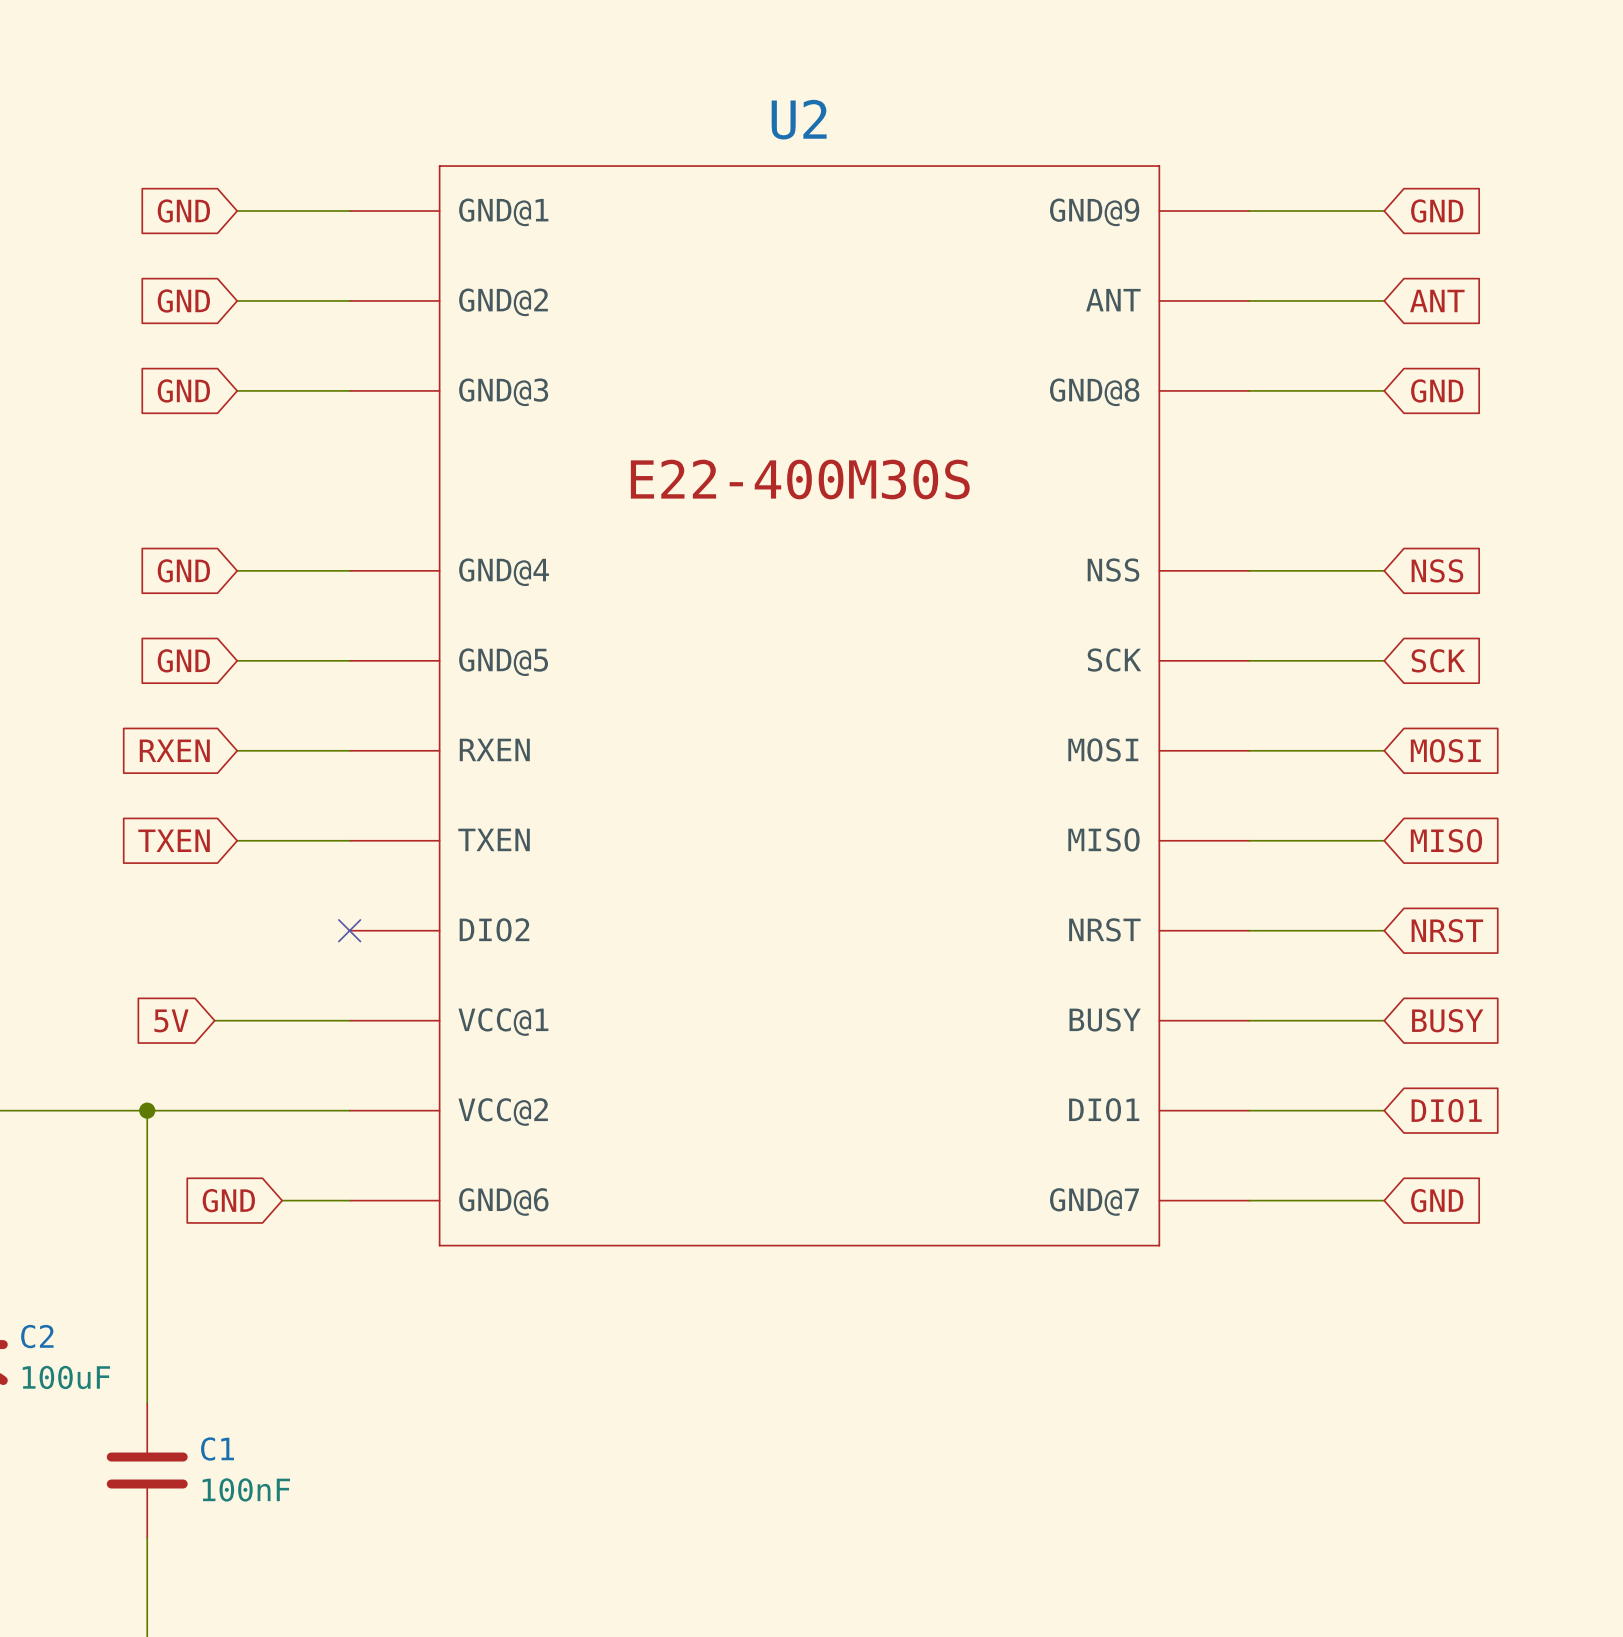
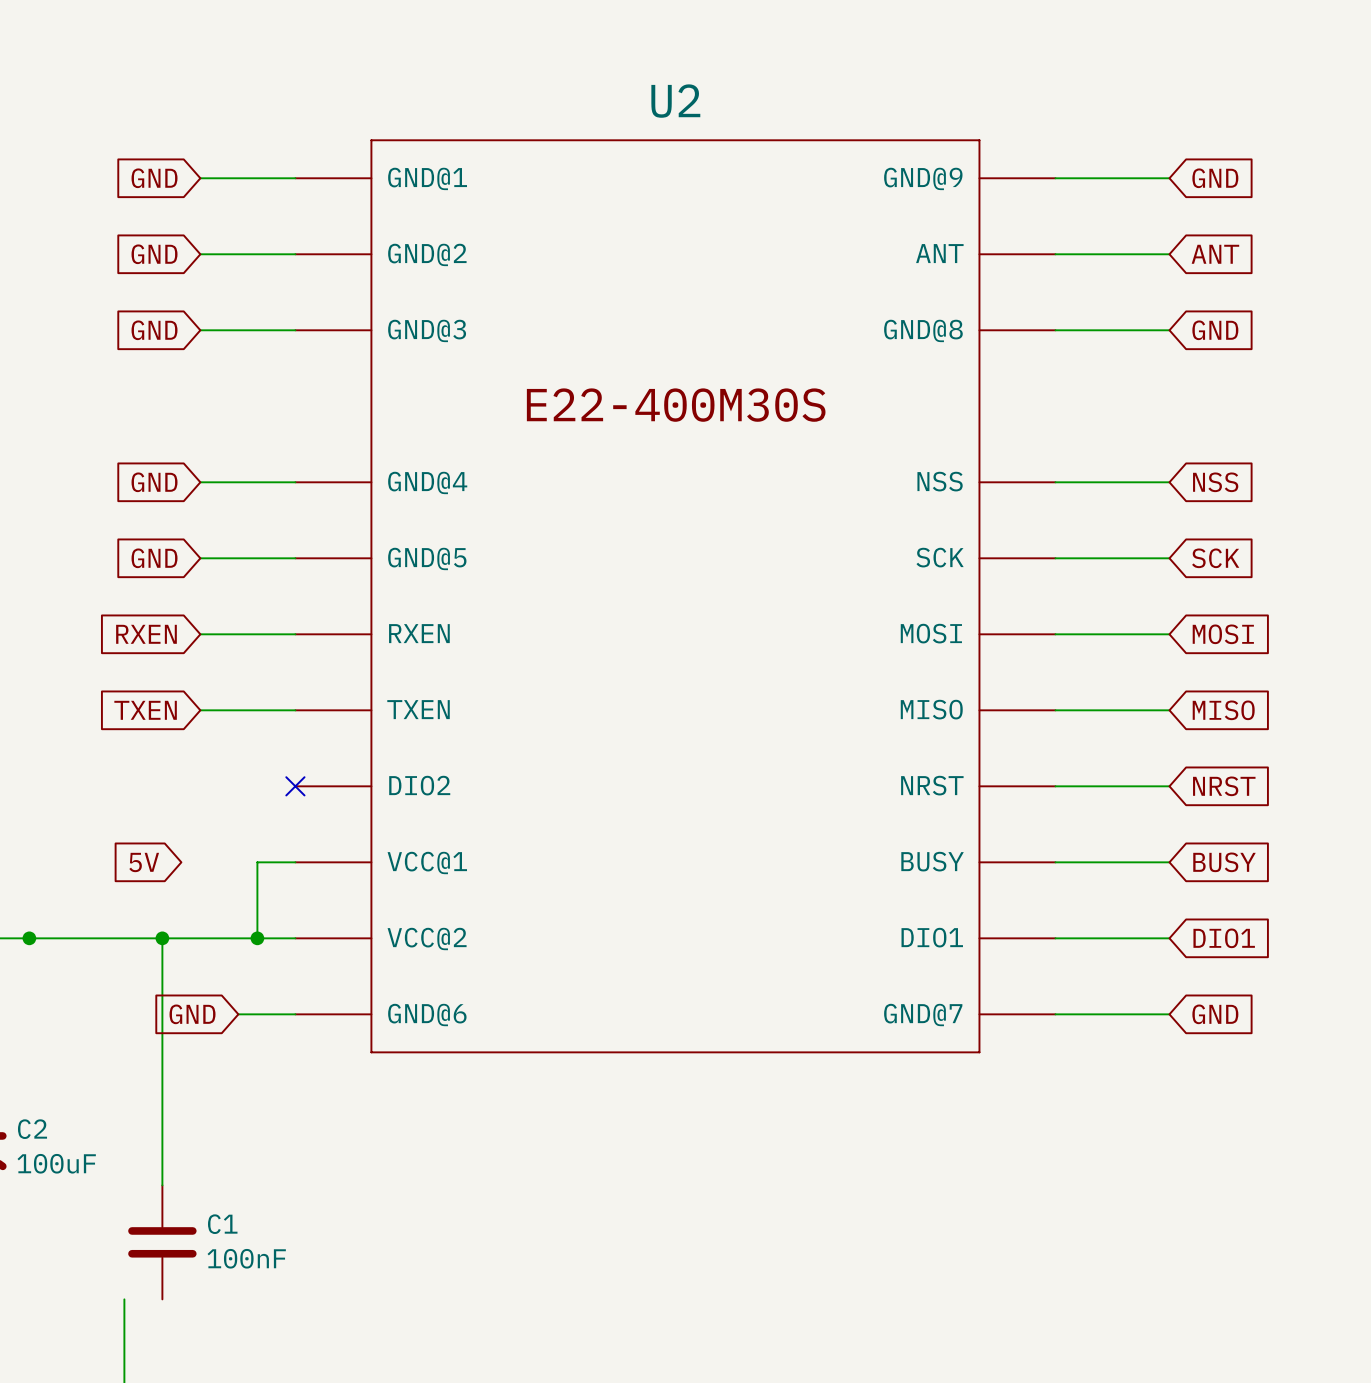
wire: (214, 1020) (304, 1020) -> (257, 938) (257, 862)
junction: none -> (29, 938)
wire: (147, 1110) (147, 1403) -> (162, 938) (162, 1185)
junction position: (147, 1110) -> (162, 938)
junction: none -> (257, 938)
C1 position: (147, 1470) -> (162, 1242)

